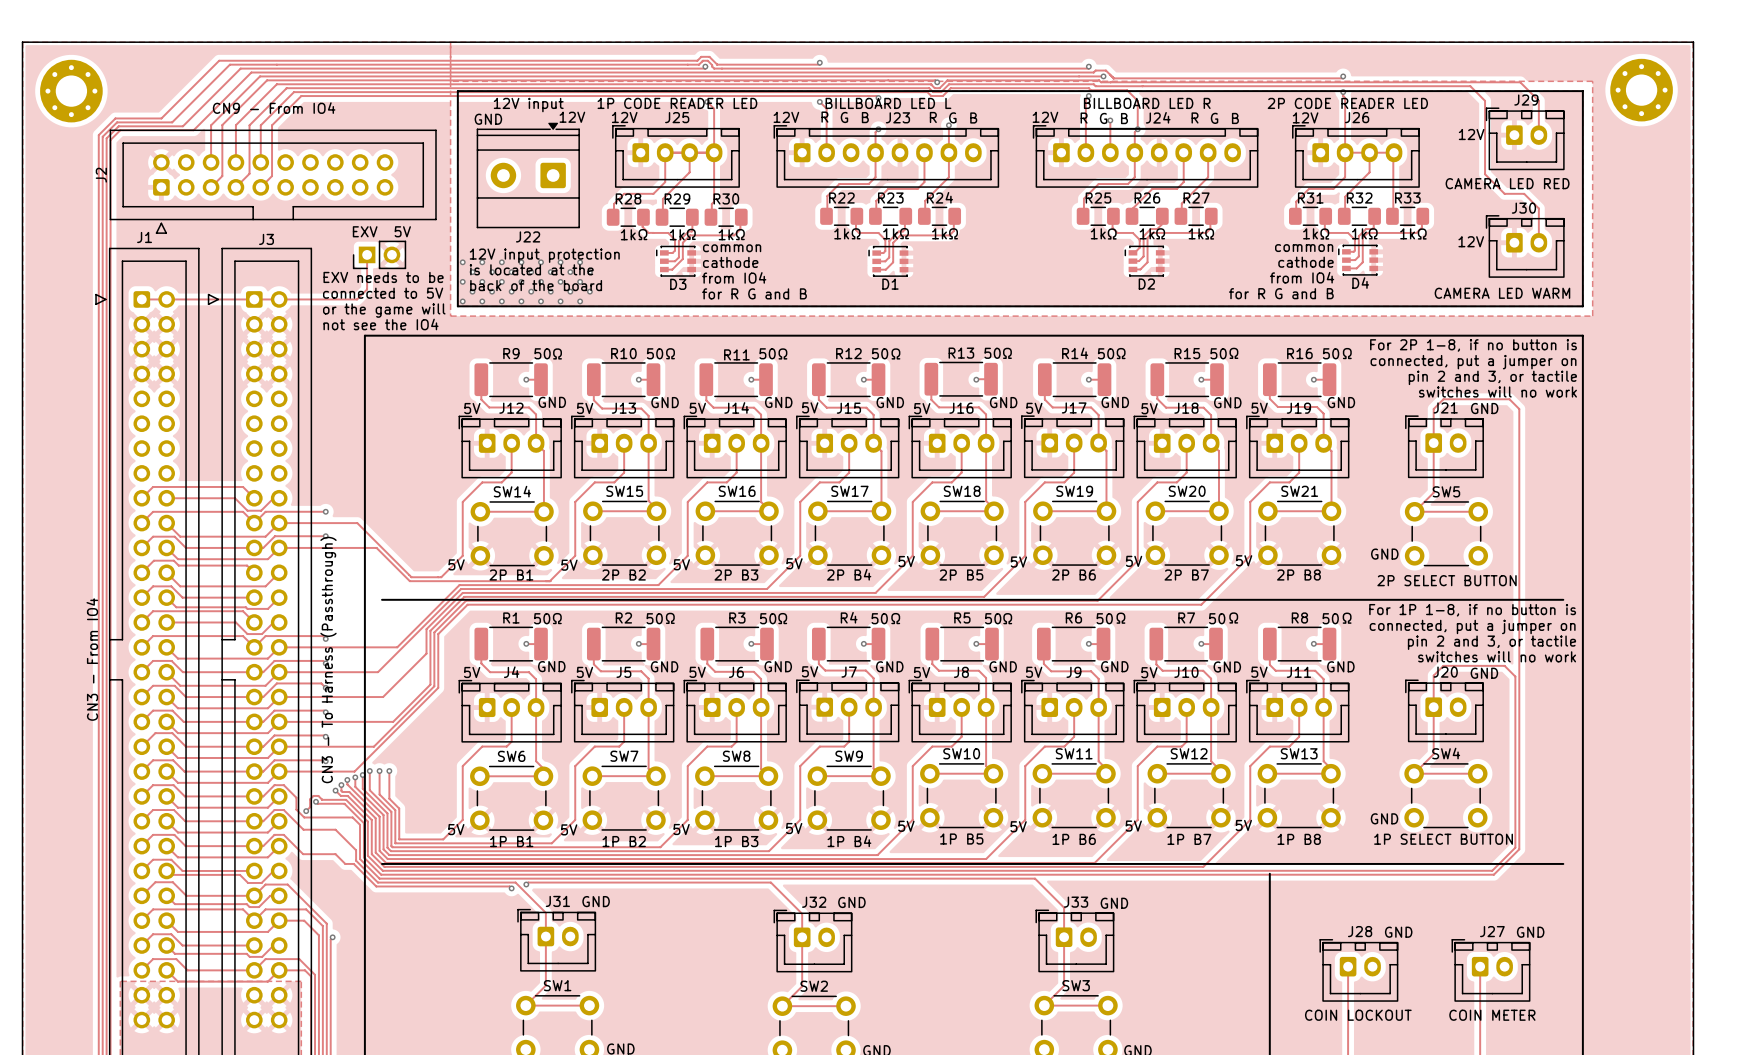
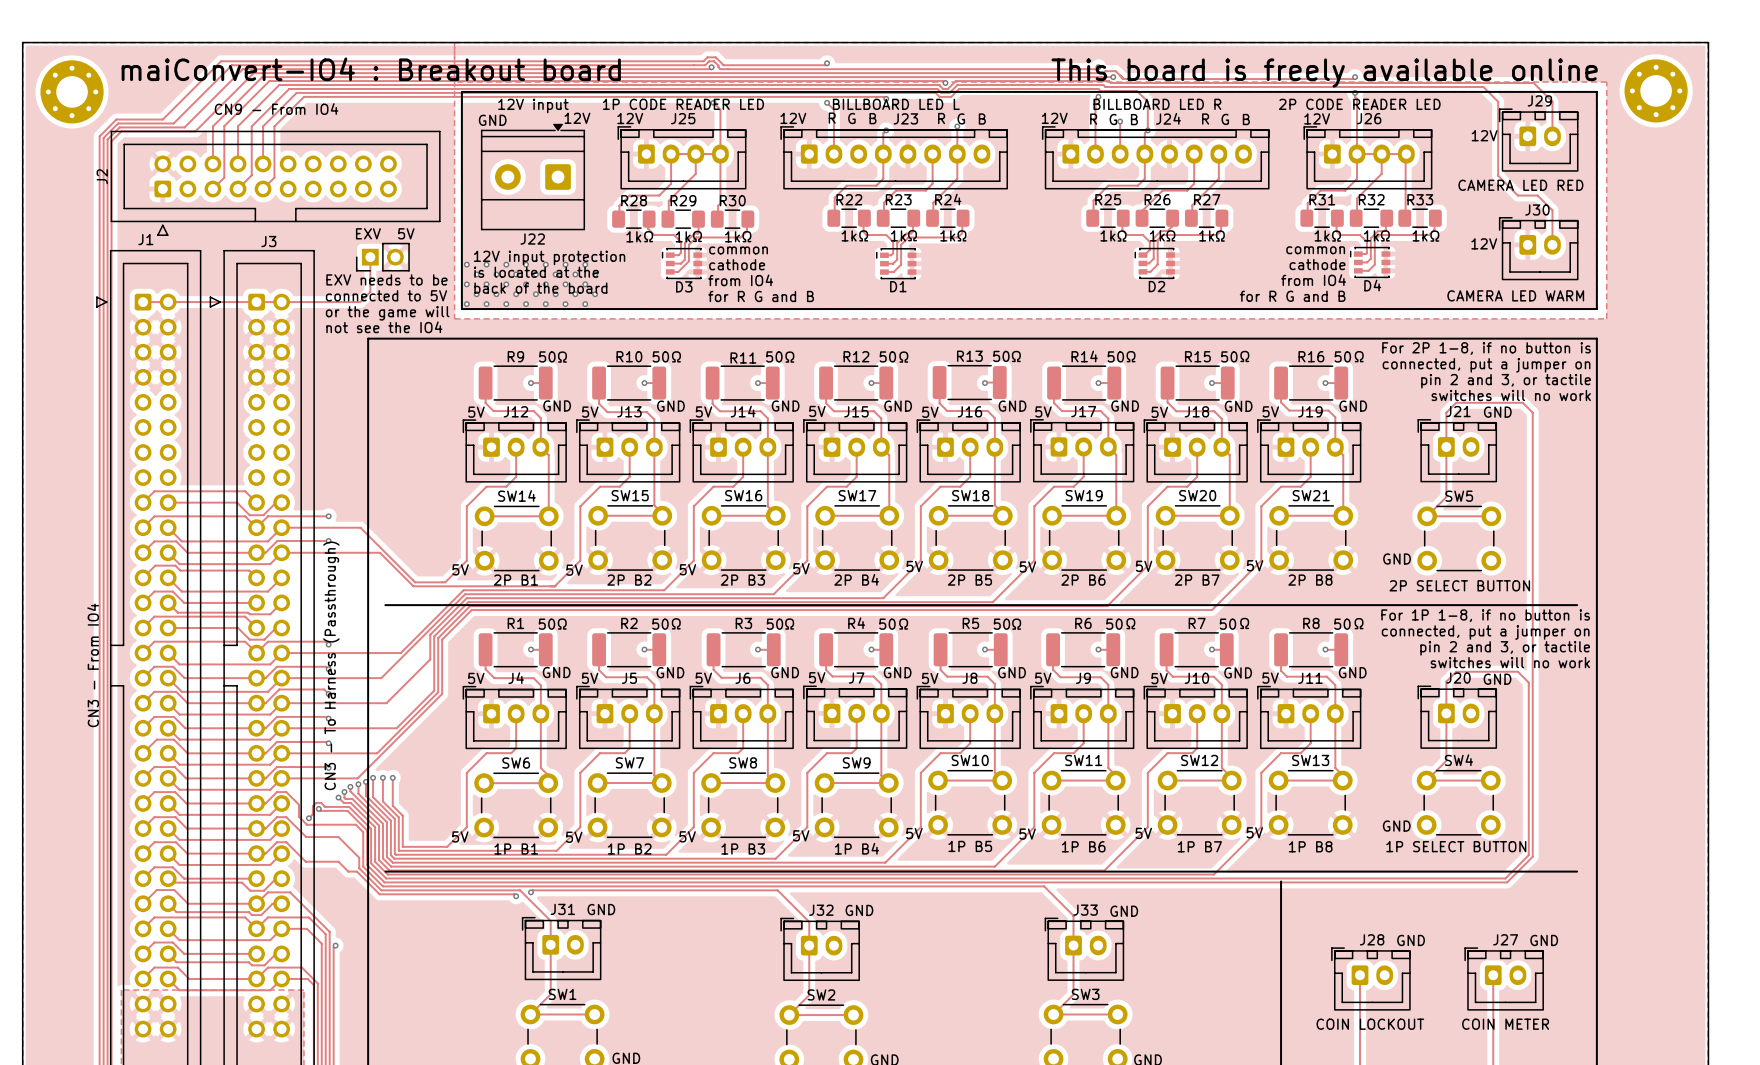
text: none -> maiConvert-IO4 : Breakout board (371, 69)
text: none -> This board is freely available online (1324, 73)

